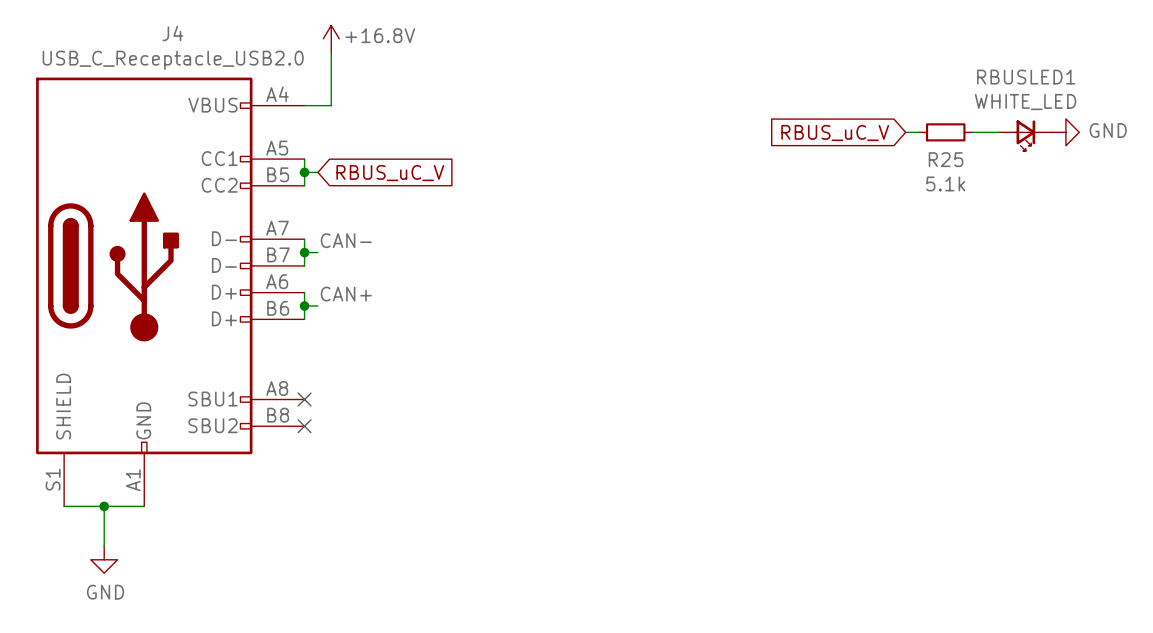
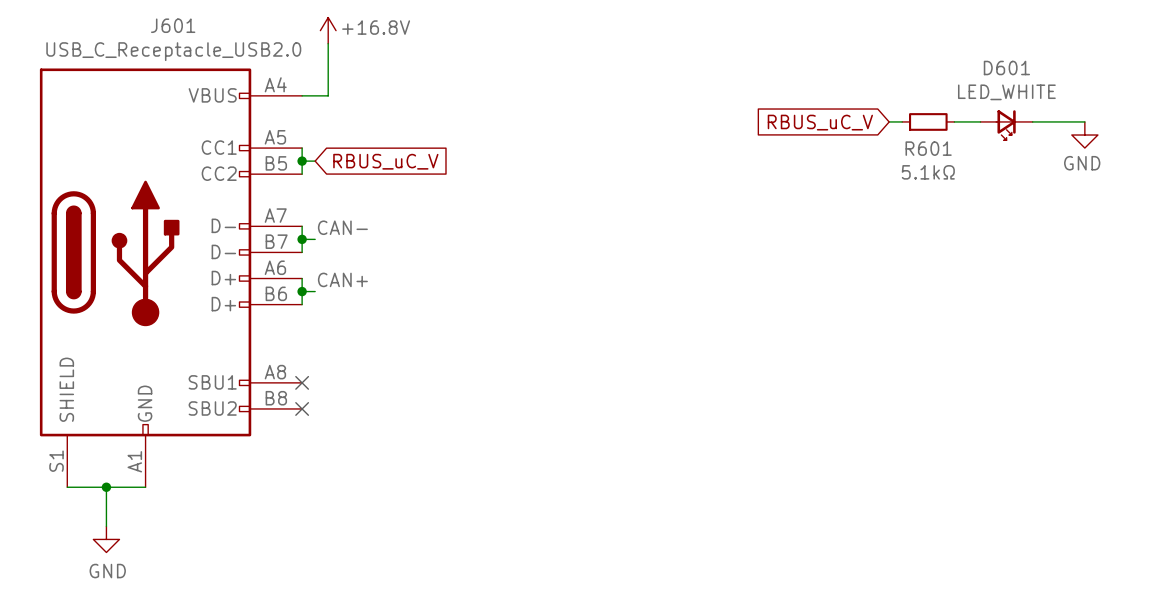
J4 name: J4 (172, 33) -> J601 (173, 25)
RBUSLED1 name: RBUSLED1 (1026, 77) -> D601 (1006, 67)
RBUSLED1 value: WHITE_LED (1025, 102) -> LED_WHITE (1006, 92)
wire: none -> (1032, 121) (1084, 121)
power symbol rotation: 0° (1065, 132) -> 90° clockwise (1084, 135)
power symbol position: GND (1065, 132) -> GND (1084, 135)
R25 name: R25 (946, 159) -> R601 (928, 148)
R25 value: 5.1k (945, 183) -> 5.1kΩ (928, 172)

